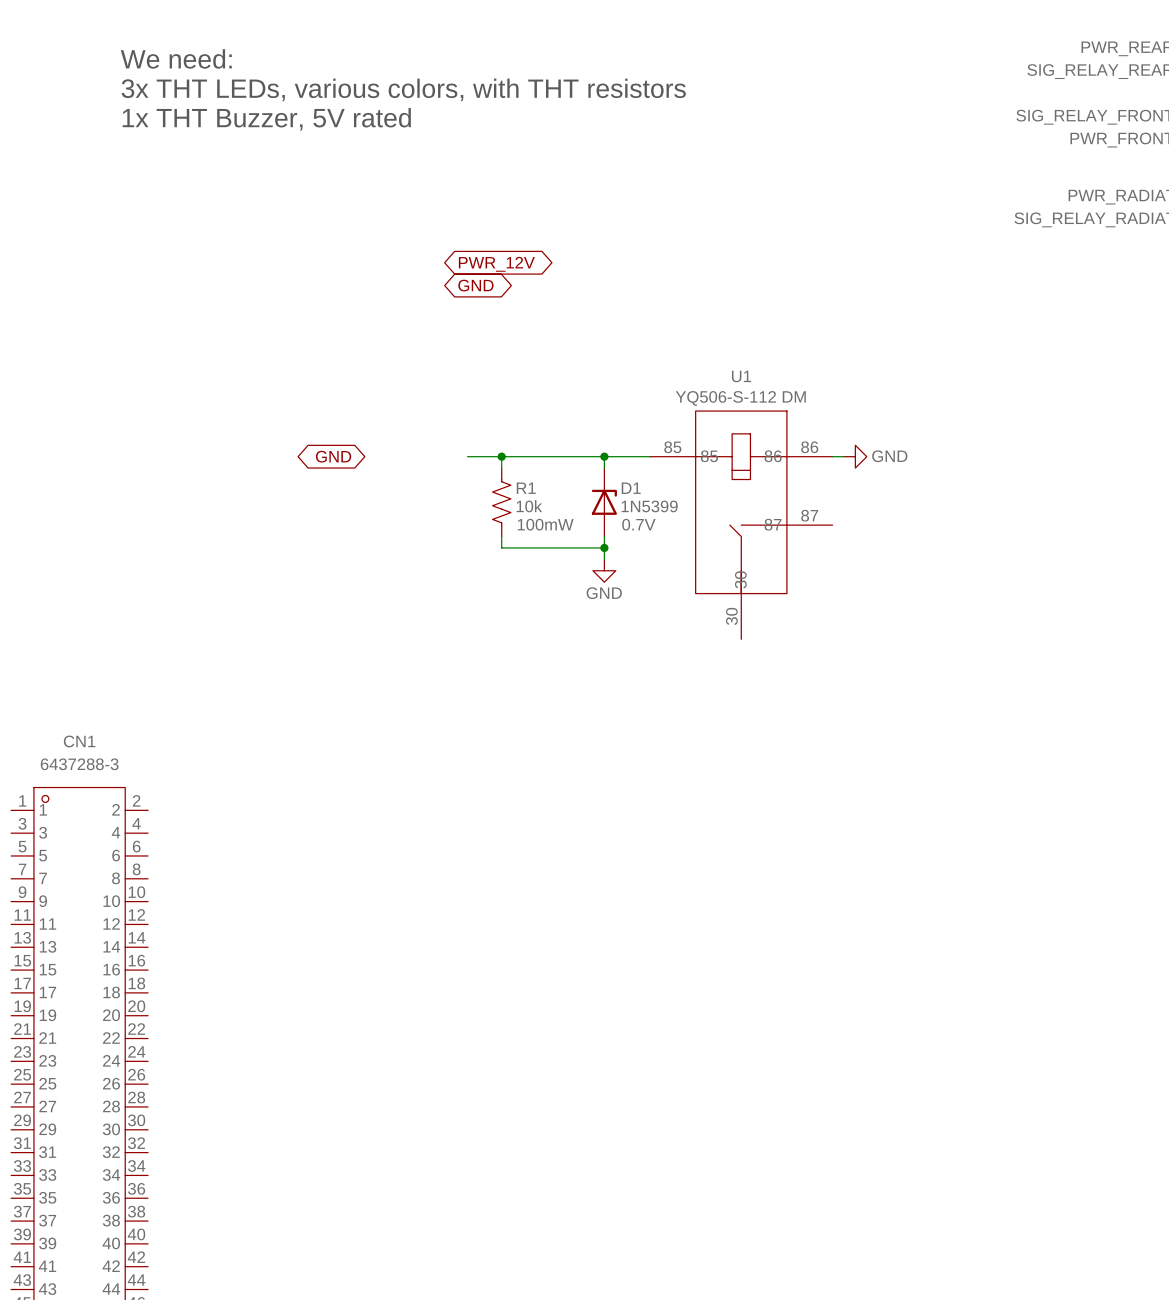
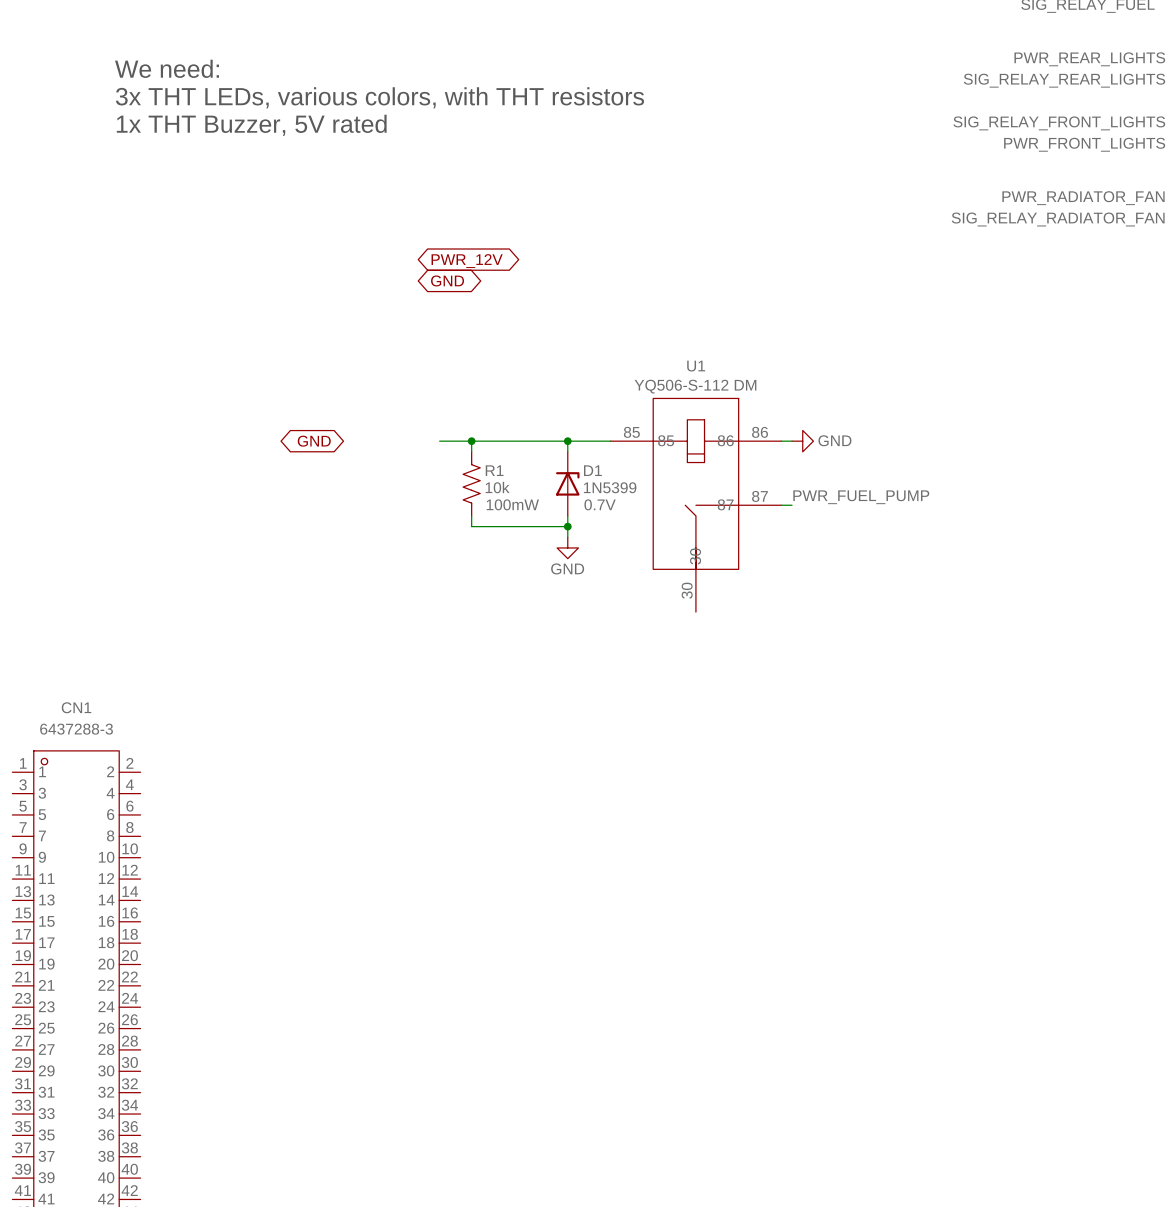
label: none -> PWR_FUEL_PUMP (861, 497)
wire: none -> (781, 505) (792, 505)

